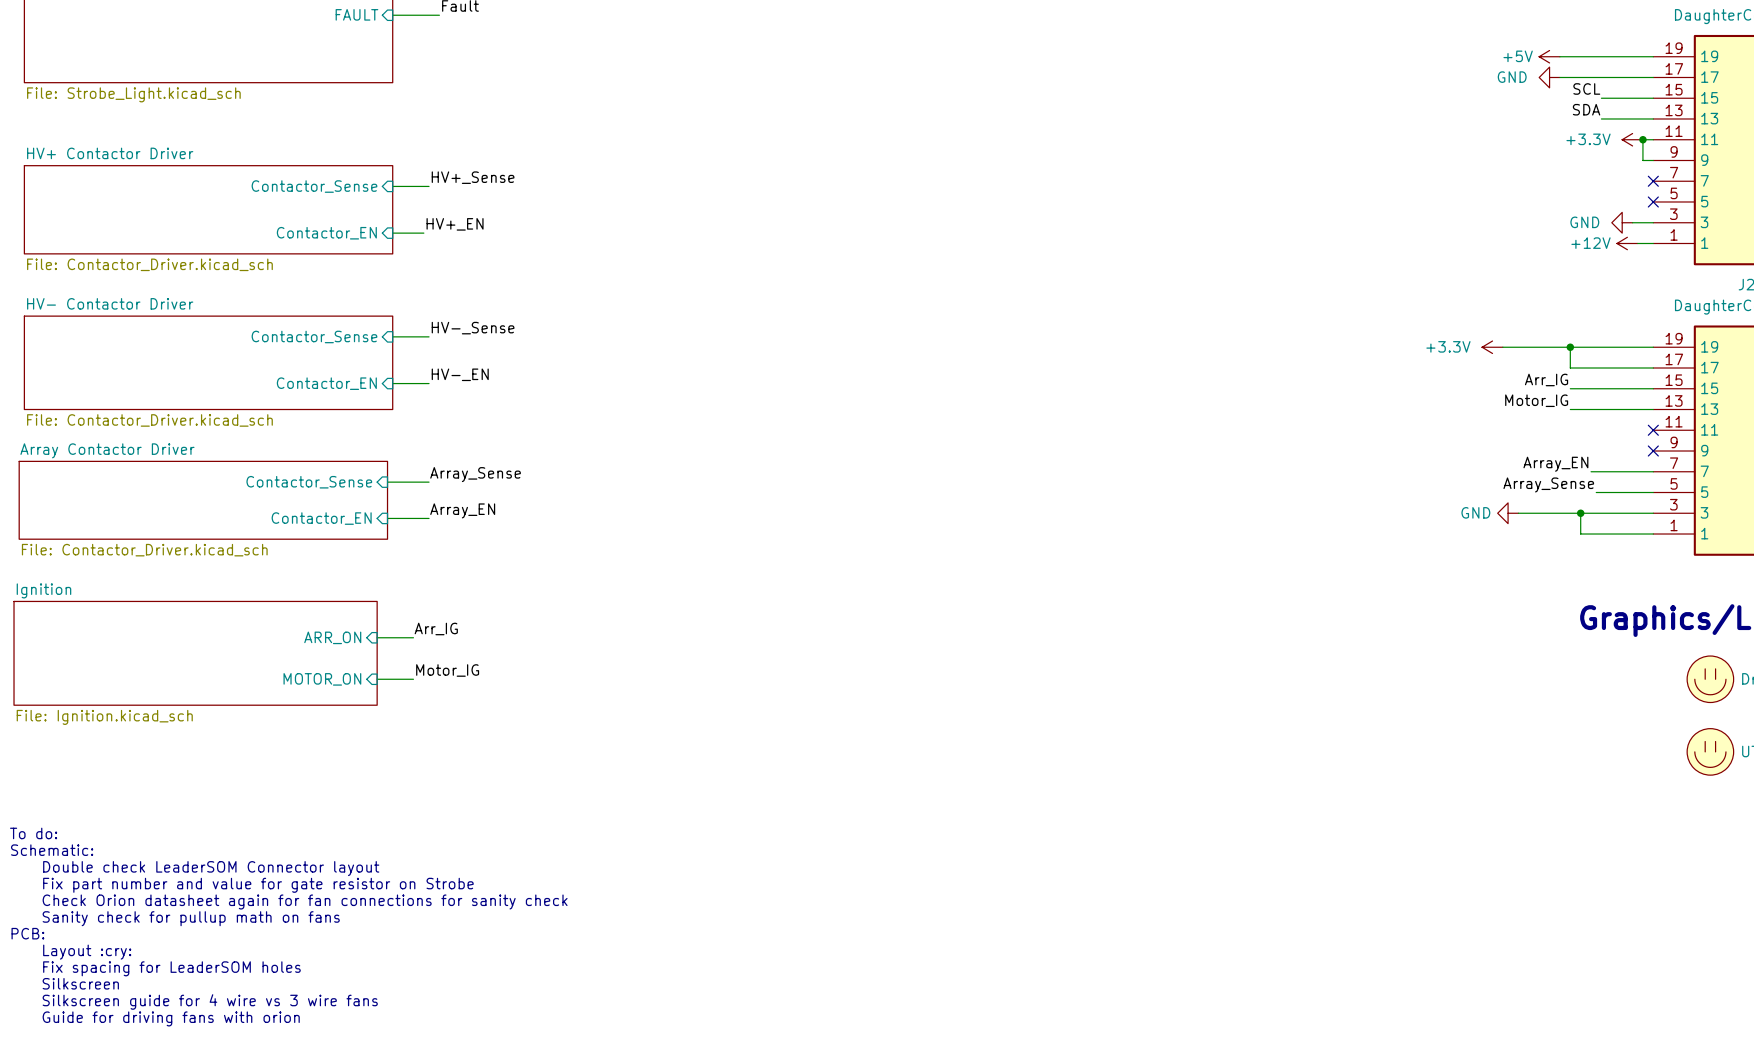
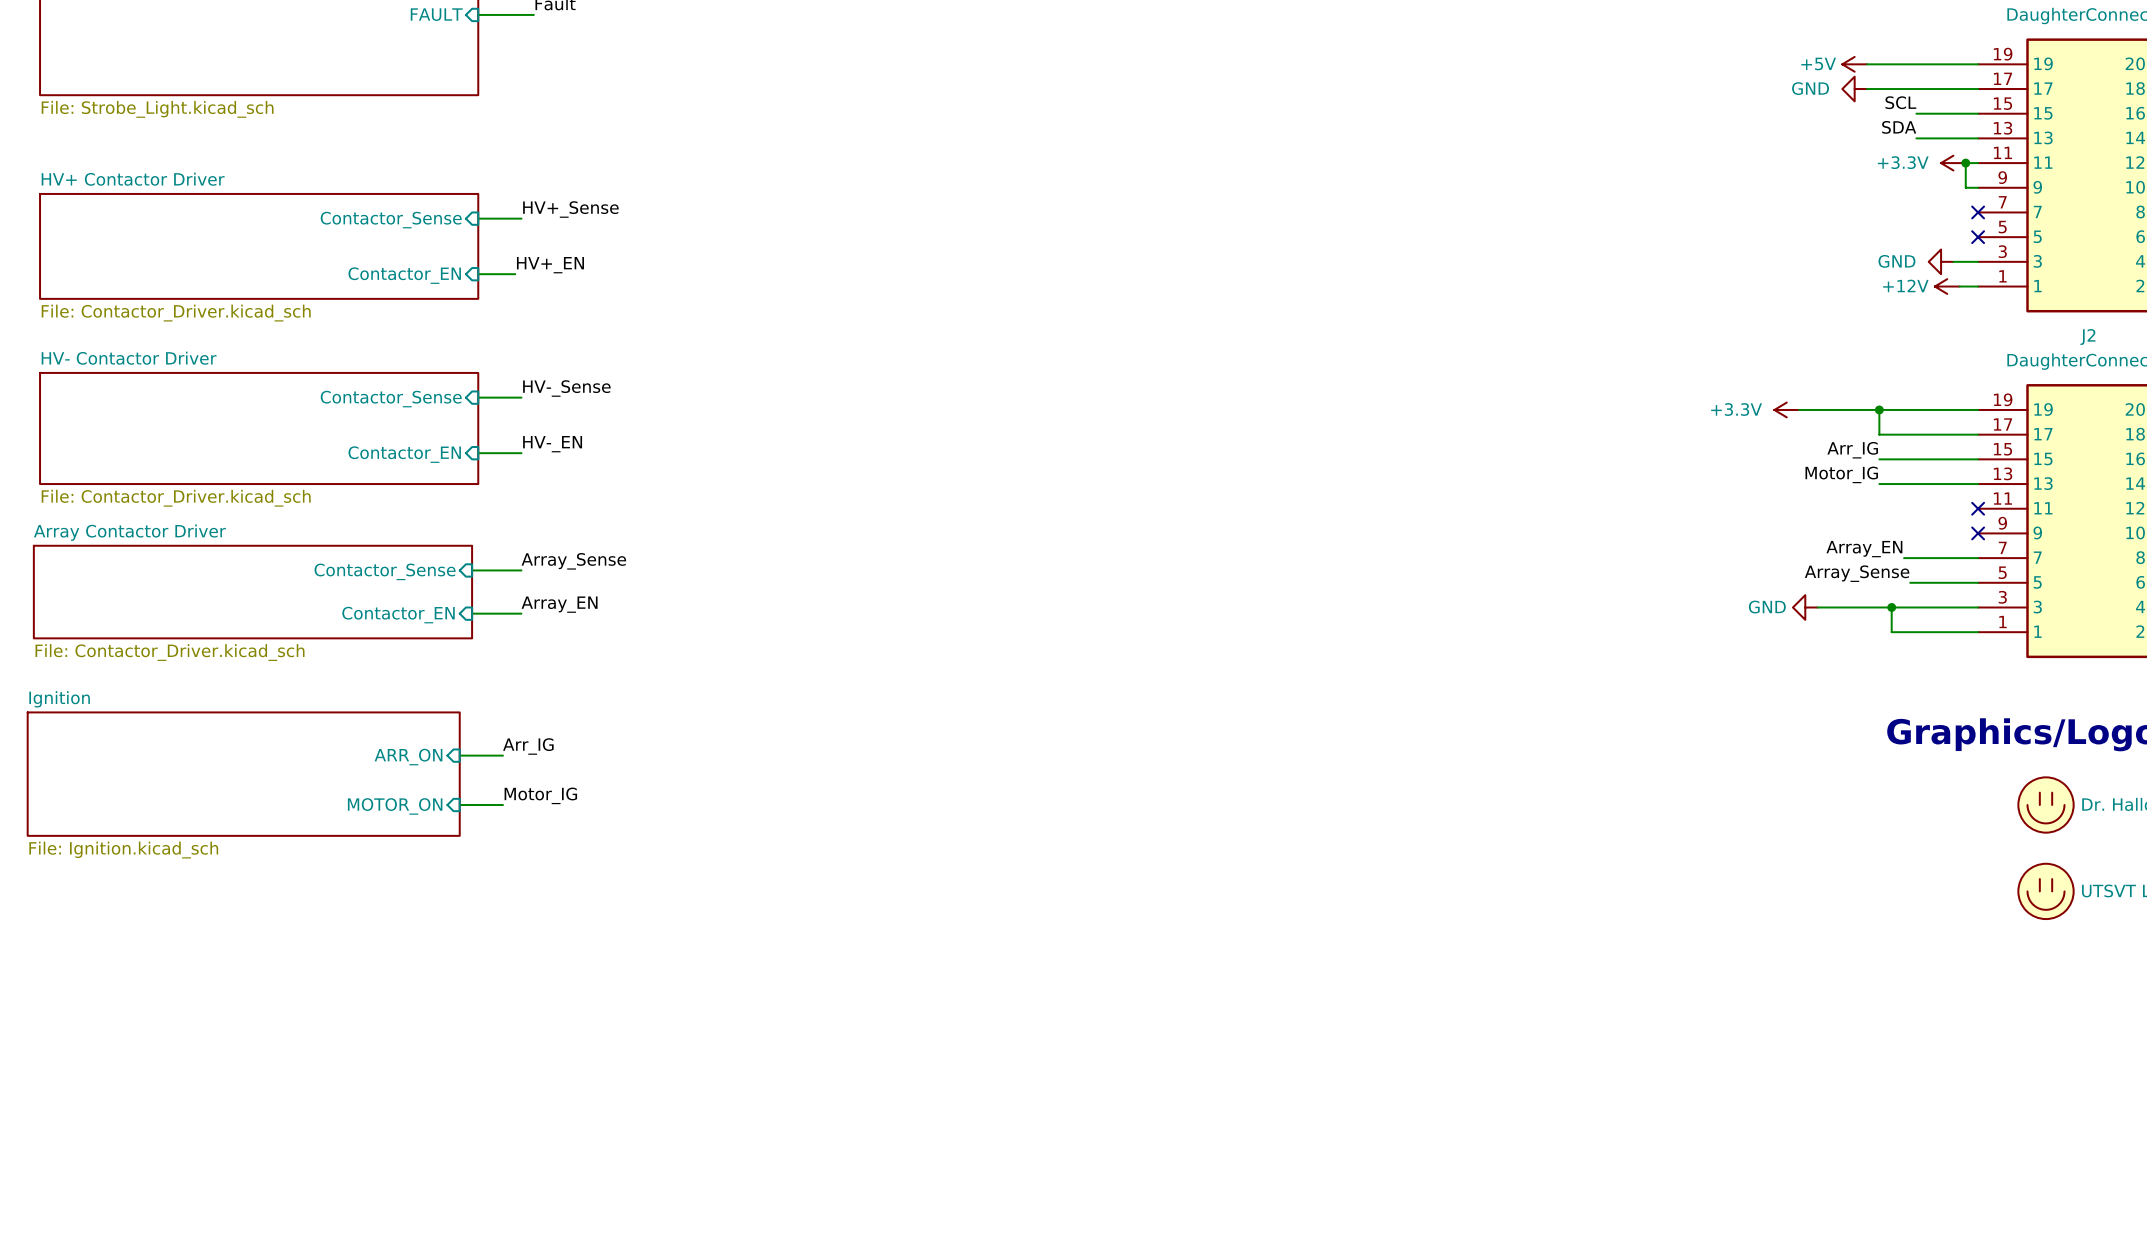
text: To do: (33, 833) -> none
text: Schematic: (52, 850) -> none
text: Double check LeaderSOM Connector layout (211, 868) -> none
text: Fix part number and value for gate resistor on Strobe (258, 885) -> none
text: Check Orion datasheet again for fan connections for sanity check (305, 901) -> none
text: Sanity check for pullup math on fans (191, 918) -> none
text: PCB: (27, 933) -> none
text: Layout :cry: (87, 952) -> none
text: Fix spacing for LeaderSOM holes (171, 968) -> none
text: Silkscreen (80, 983) -> none
text: Silkscreen guide for 4 wire vs 3 wire fans (210, 1001) -> none
text: Guide for driving fans with orion (171, 1018) -> none

